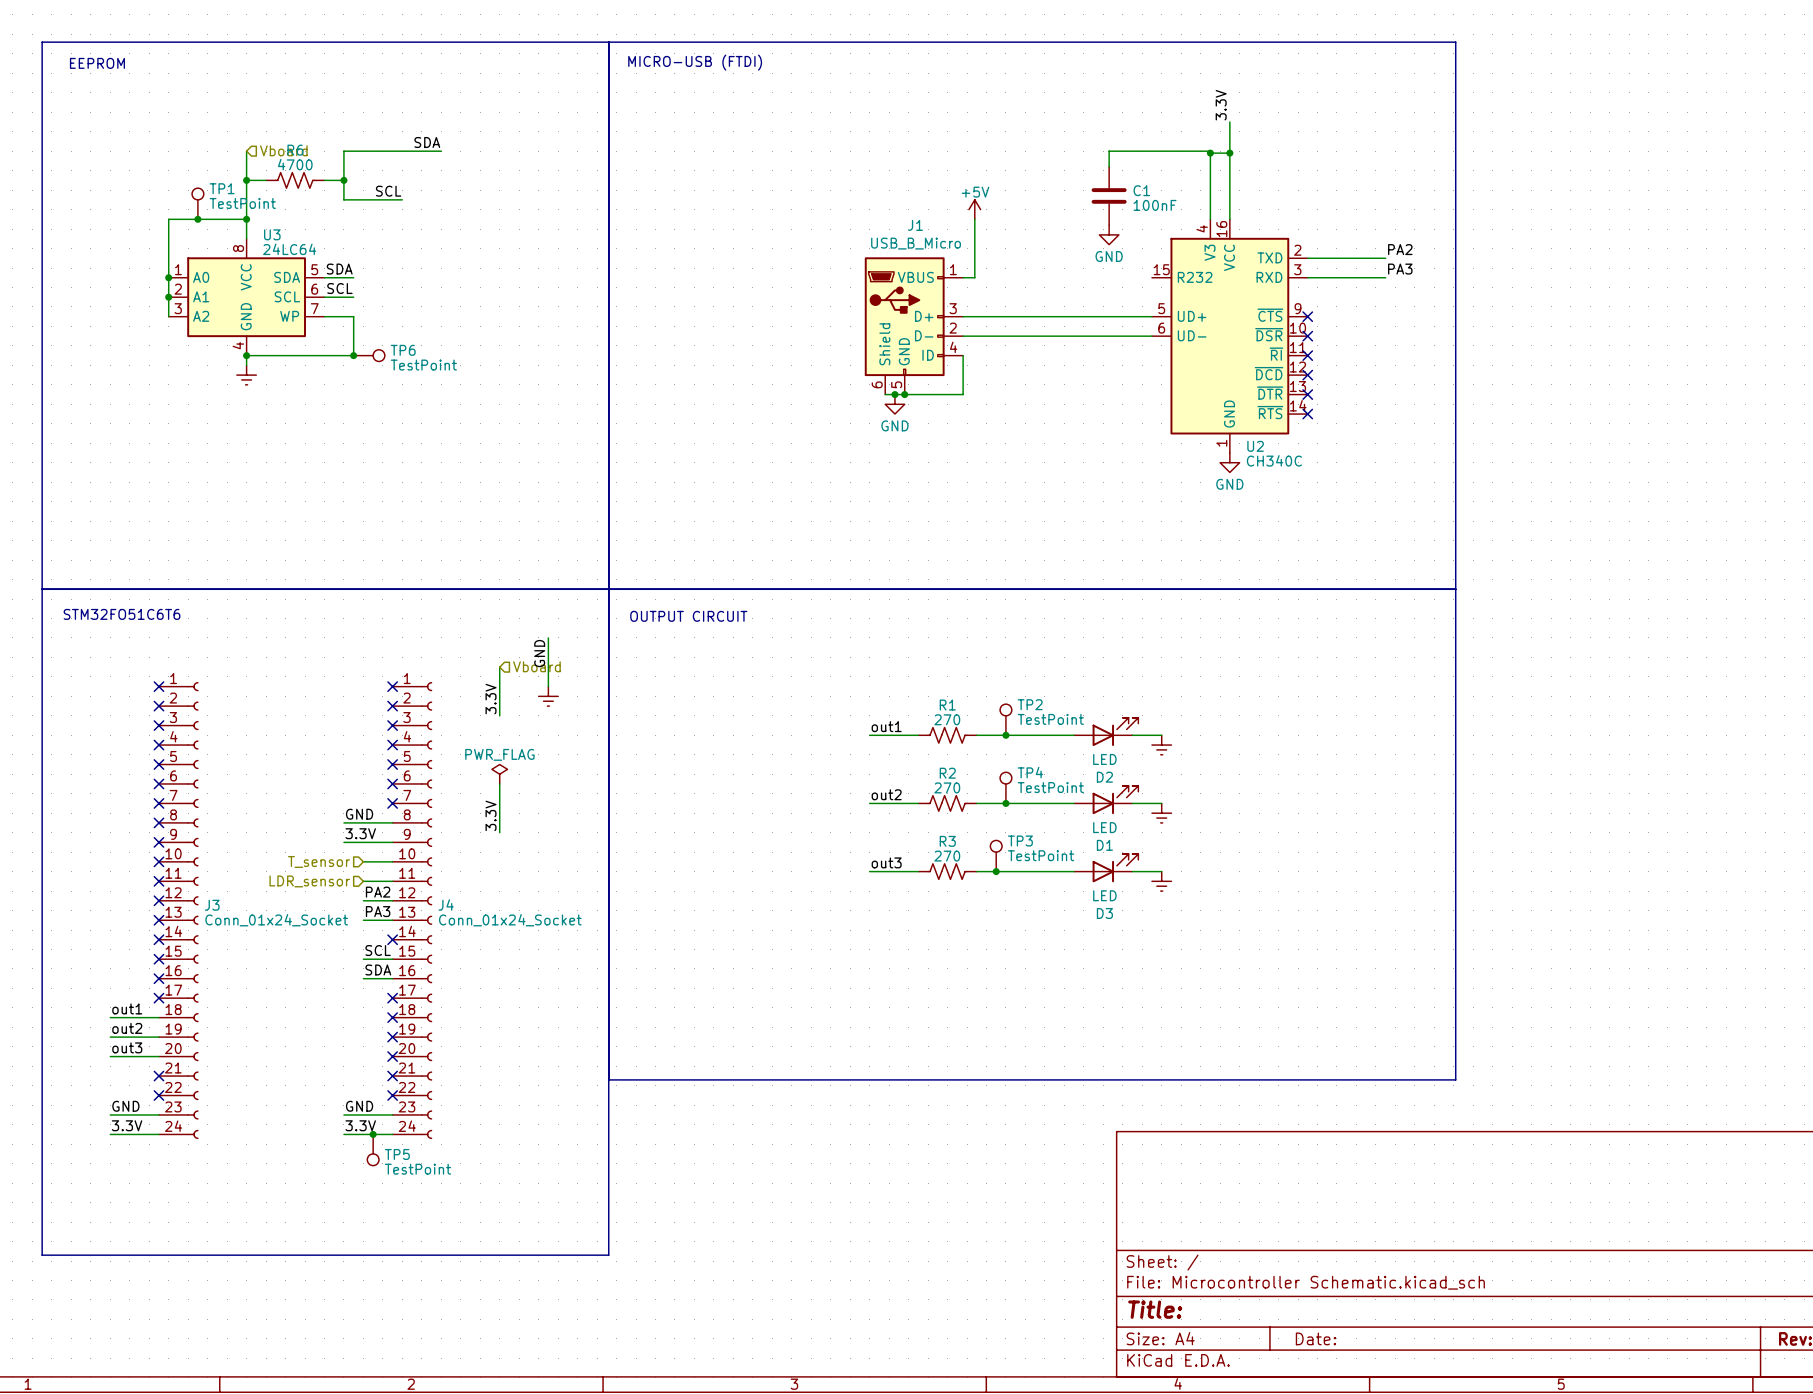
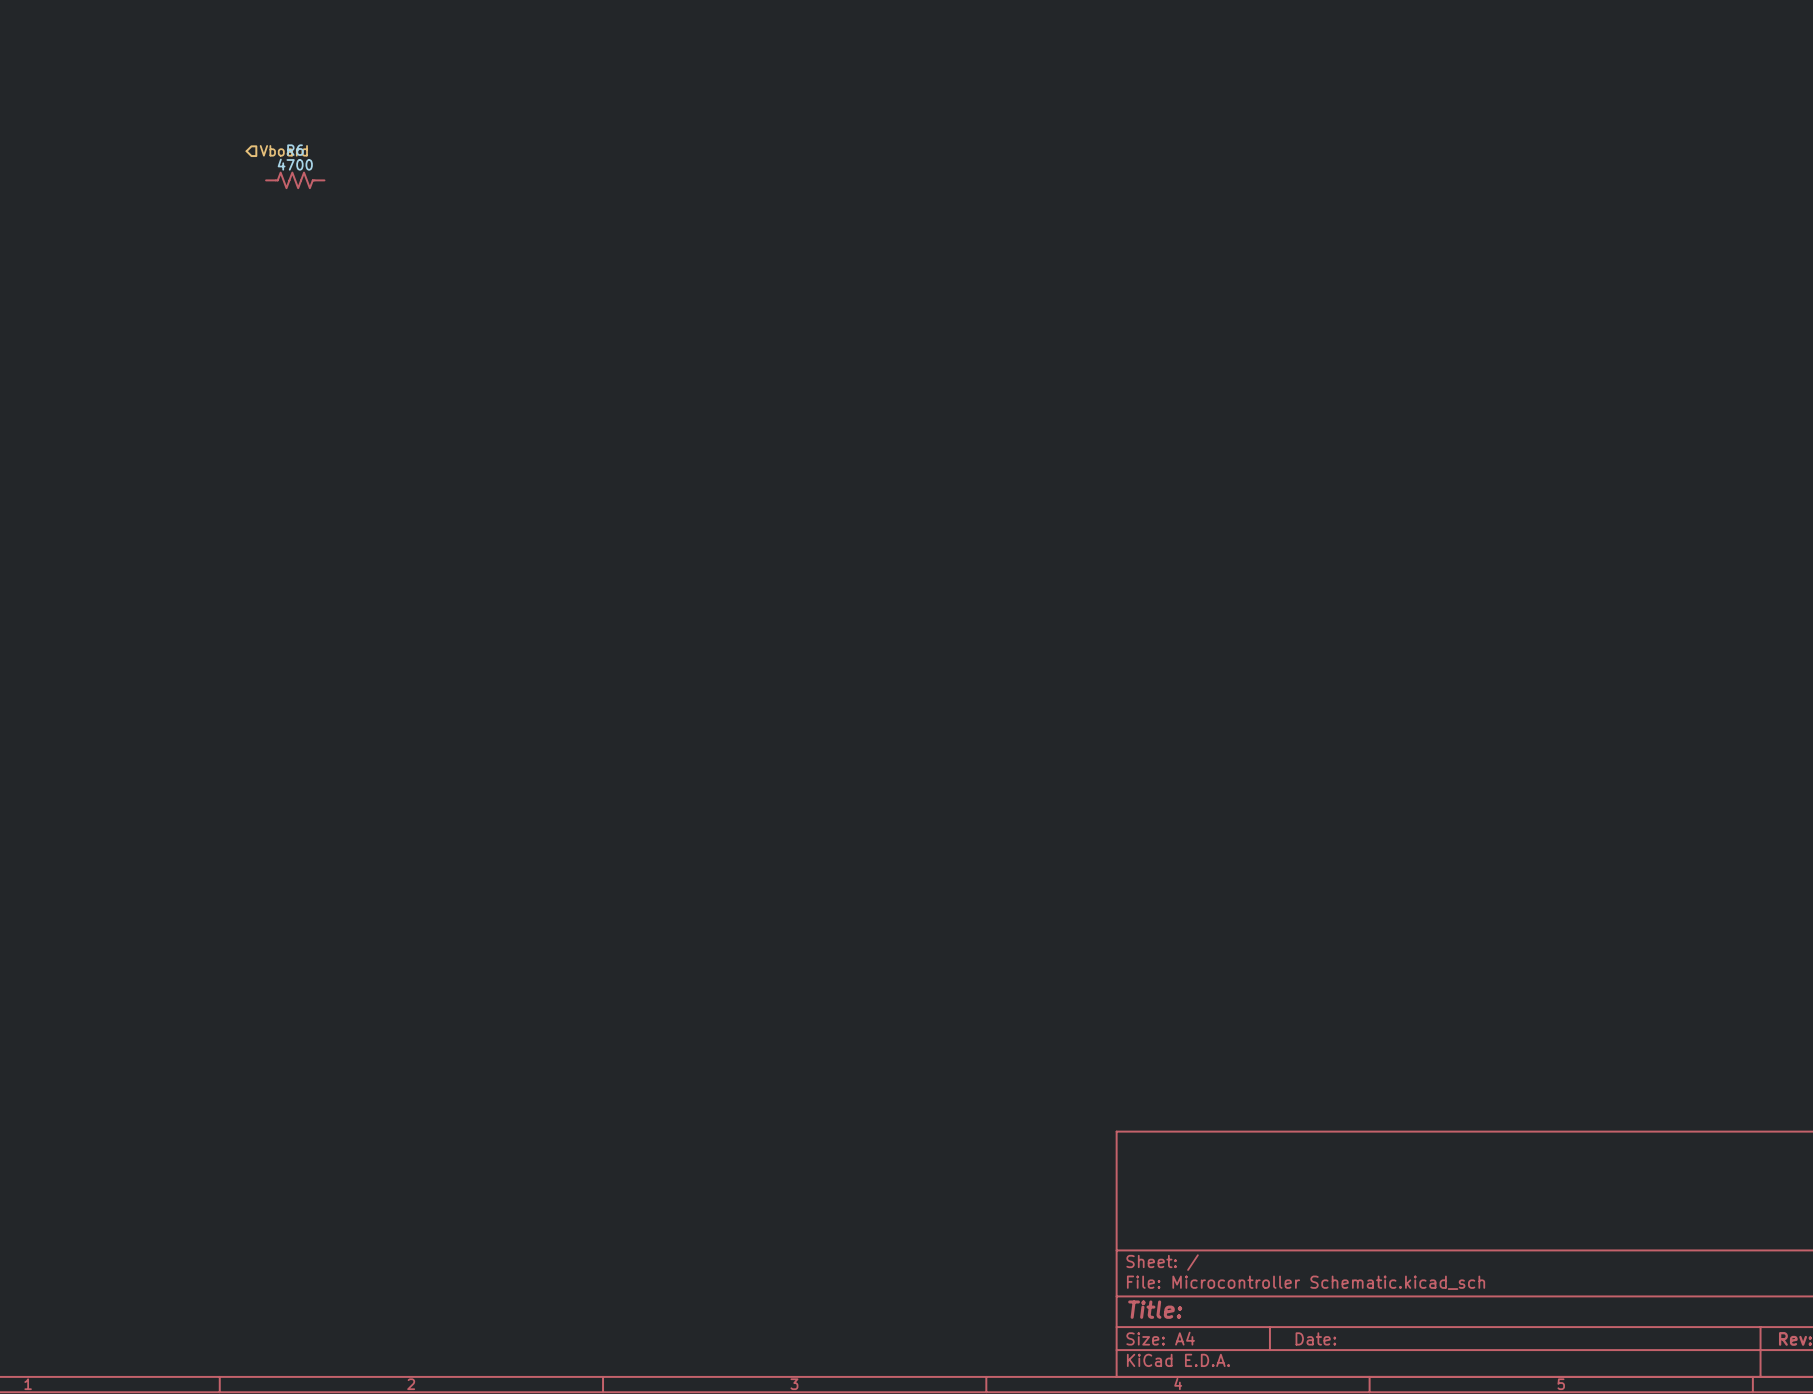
line: (608, 42) (608, 1255) (42, 1255) (42, 42) (1455, 42) (1455, 1079) (608, 1079) -> none
text: MICRO-USB (FTDI) (695, 62) -> none
text: EEPROM (97, 63) -> none
label: 3.3V (1221, 105) -> none
wire: (1229, 121) (1229, 219) -> none
label: SDA (427, 142) -> none
wire: (246, 151) (246, 238) -> none
wire: (441, 151) (343, 151) (343, 199) (402, 199) -> none
wire: (1210, 153) (1229, 153) -> none
junction: (1210, 153) -> none
junction: (1229, 153) -> none
wire: (1109, 166) (1109, 151) (1210, 151) (1210, 219) -> none
wire: (246, 180) (266, 180) -> none
junction: (246, 180) -> none
wire: (324, 180) (343, 180) -> none
junction: (343, 180) -> none
label: SCL (388, 191) -> none
C1: 100nF (1109, 195) -> none
TP1: TestPoint (197, 203) -> none
power symbol: +5V (974, 209) -> none
junction: (197, 219) -> none
wire: (246, 219) (168, 219) (168, 316) -> none
junction: (246, 219) -> none
wire: (974, 219) (974, 277) (963, 277) -> none
power symbol: GND (1109, 234) -> none
label: PA2 (1400, 249) -> none
wire: (1307, 258) (1385, 258) -> none
label: SDA (339, 269) -> none
label: PA3 (1400, 269) -> none
junction: (168, 277) -> none
wire: (324, 277) (353, 277) -> none
wire: (1307, 277) (1385, 277) -> none
label: SCL (339, 288) -> none
junction: (168, 297) -> none
U3: 24LC64 (246, 297) -> none
wire: (324, 297) (353, 297) -> none
wire: (324, 316) (353, 316) (353, 355) (246, 355) (246, 365) -> none
wire: (963, 316) (1151, 316) -> none
no-connect mark: (1307, 316) -> none
J1: USB_B_Micro (913, 325) -> none
wire: (963, 336) (1151, 336) -> none
U2: CH340C (1229, 336) -> none
no-connect mark: (1307, 336) -> none
junction: (246, 355) -> none
junction: (353, 355) -> none
TP6: TestPoint (369, 355) -> none
wire: (963, 355) (963, 394) (885, 394) -> none
no-connect mark: (1307, 355) -> none
power symbol: (246, 375) -> none
no-connect mark: (1307, 375) -> none
junction: (894, 394) -> none
junction: (904, 394) -> none
no-connect mark: (1307, 394) -> none
power symbol: GND (894, 404) -> none
no-connect mark: (1307, 414) -> none
power symbol: GND (1229, 462) -> none
line: (42, 589) (1455, 589) -> none
text: STM32FO51C6T6 (122, 614) -> none
text: OUTPUT CIRCUIT (688, 616) -> none
wire: (548, 637) (548, 686) -> none
label: GND (539, 653) -> none
hierarchical label: Vboard (536, 666) -> none
wire: (499, 667) (499, 715) -> none
no-connect mark: (158, 686) -> none
no-connect mark: (392, 686) -> none
power symbol: (548, 696) -> none
label: 3.3V (491, 699) -> none
no-connect mark: (158, 706) -> none
no-connect mark: (392, 706) -> none
TP2: TestPoint (1005, 719) -> none
no-connect mark: (158, 725) -> none
no-connect mark: (392, 725) -> none
label: out1 (886, 726) -> none
D2: LED (1106, 731) -> none
wire: (869, 735) (918, 735) -> none
R1: 270 (947, 735) -> none
wire: (976, 735) (1074, 735) -> none
junction: (1005, 735) -> none
wire: (1132, 735) (1161, 735) -> none
no-connect mark: (158, 745) -> none
no-connect mark: (392, 745) -> none
power symbol: (1161, 745) -> none
no-connect mark: (158, 764) -> none
no-connect mark: (392, 764) -> none
power symbol: PWR_FLAG (499, 774) -> none
no-connect mark: (158, 783) -> none
no-connect mark: (392, 783) -> none
wire: (499, 783) (499, 832) -> none
TP4: TestPoint (1005, 787) -> none
label: out2 (886, 794) -> none
D1: LED (1106, 800) -> none
no-connect mark: (158, 803) -> none
no-connect mark: (392, 803) -> none
wire: (869, 803) (918, 803) -> none
R2: 270 (947, 803) -> none
wire: (976, 803) (1074, 803) -> none
junction: (1005, 803) -> none
wire: (1132, 803) (1161, 803) -> none
power symbol: (1161, 813) -> none
label: GND (359, 814) -> none
label: 3.3V (491, 815) -> none
no-connect mark: (158, 822) -> none
wire: (343, 822) (392, 822) -> none
label: 3.3V (360, 833) -> none
no-connect mark: (158, 842) -> none
wire: (343, 842) (392, 842) -> none
TP3: TestPoint (996, 856) -> none
no-connect mark: (158, 861) -> none
hierarchical label: T_sensor (318, 861) -> none
wire: (363, 861) (392, 861) -> none
label: out3 (886, 862) -> none
D3: LED (1106, 868) -> none
wire: (869, 871) (918, 871) -> none
R3: 270 (947, 871) -> none
wire: (976, 871) (1074, 871) -> none
junction: (996, 871) -> none
wire: (1132, 871) (1161, 871) -> none
no-connect mark: (158, 881) -> none
hierarchical label: LDR_sensor (309, 881) -> none
wire: (363, 881) (392, 881) -> none
power symbol: (1161, 881) -> none
label: PA2 (378, 892) -> none
no-connect mark: (158, 900) -> none
wire: (363, 900) (392, 900) -> none
J3: Conn_01x24_Socket (178, 910) -> none
J4: Conn_01x24_Socket (412, 910) -> none
label: PA3 (378, 911) -> none
no-connect mark: (158, 920) -> none
wire: (363, 920) (392, 920) -> none
no-connect mark: (158, 939) -> none
no-connect mark: (392, 939) -> none
label: SCL (378, 950) -> none
no-connect mark: (158, 959) -> none
wire: (363, 959) (392, 959) -> none
label: SDA (378, 970) -> none
no-connect mark: (158, 978) -> none
wire: (363, 978) (392, 978) -> none
no-connect mark: (158, 998) -> none
no-connect mark: (392, 998) -> none
label: out1 (127, 1008) -> none
wire: (110, 1017) (158, 1017) -> none
no-connect mark: (392, 1017) -> none
label: out2 (127, 1028) -> none
wire: (110, 1037) (158, 1037) -> none
no-connect mark: (392, 1037) -> none
label: out3 (127, 1047) -> none
wire: (110, 1056) (158, 1056) -> none
no-connect mark: (392, 1056) -> none
no-connect mark: (158, 1076) -> none
no-connect mark: (392, 1076) -> none
no-connect mark: (158, 1095) -> none
no-connect mark: (392, 1095) -> none
label: GND (125, 1106) -> none
label: GND (359, 1106) -> none
wire: (110, 1114) (158, 1114) -> none
wire: (343, 1114) (392, 1114) -> none
label: 3.3V (127, 1125) -> none
label: 3.3V (360, 1125) -> none
wire: (110, 1134) (158, 1134) -> none
wire: (343, 1134) (392, 1134) -> none
junction: (373, 1134) -> none
TP5: TestPoint (373, 1150) -> none

